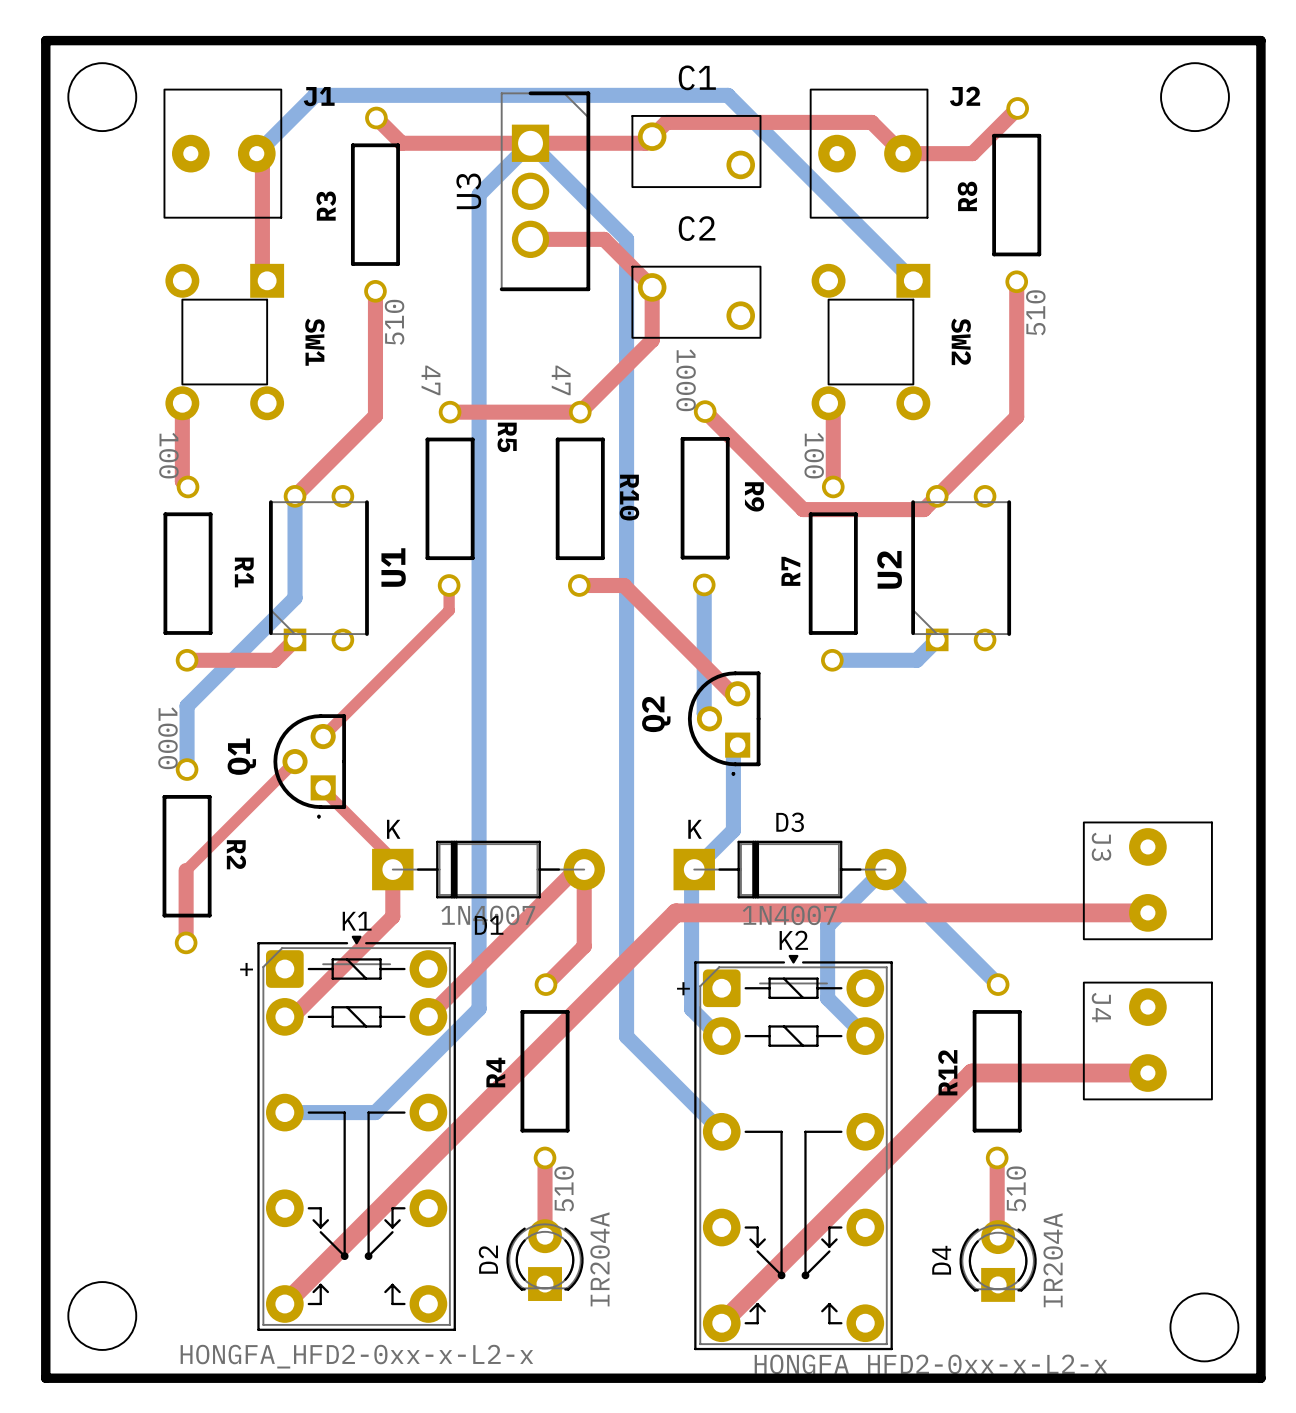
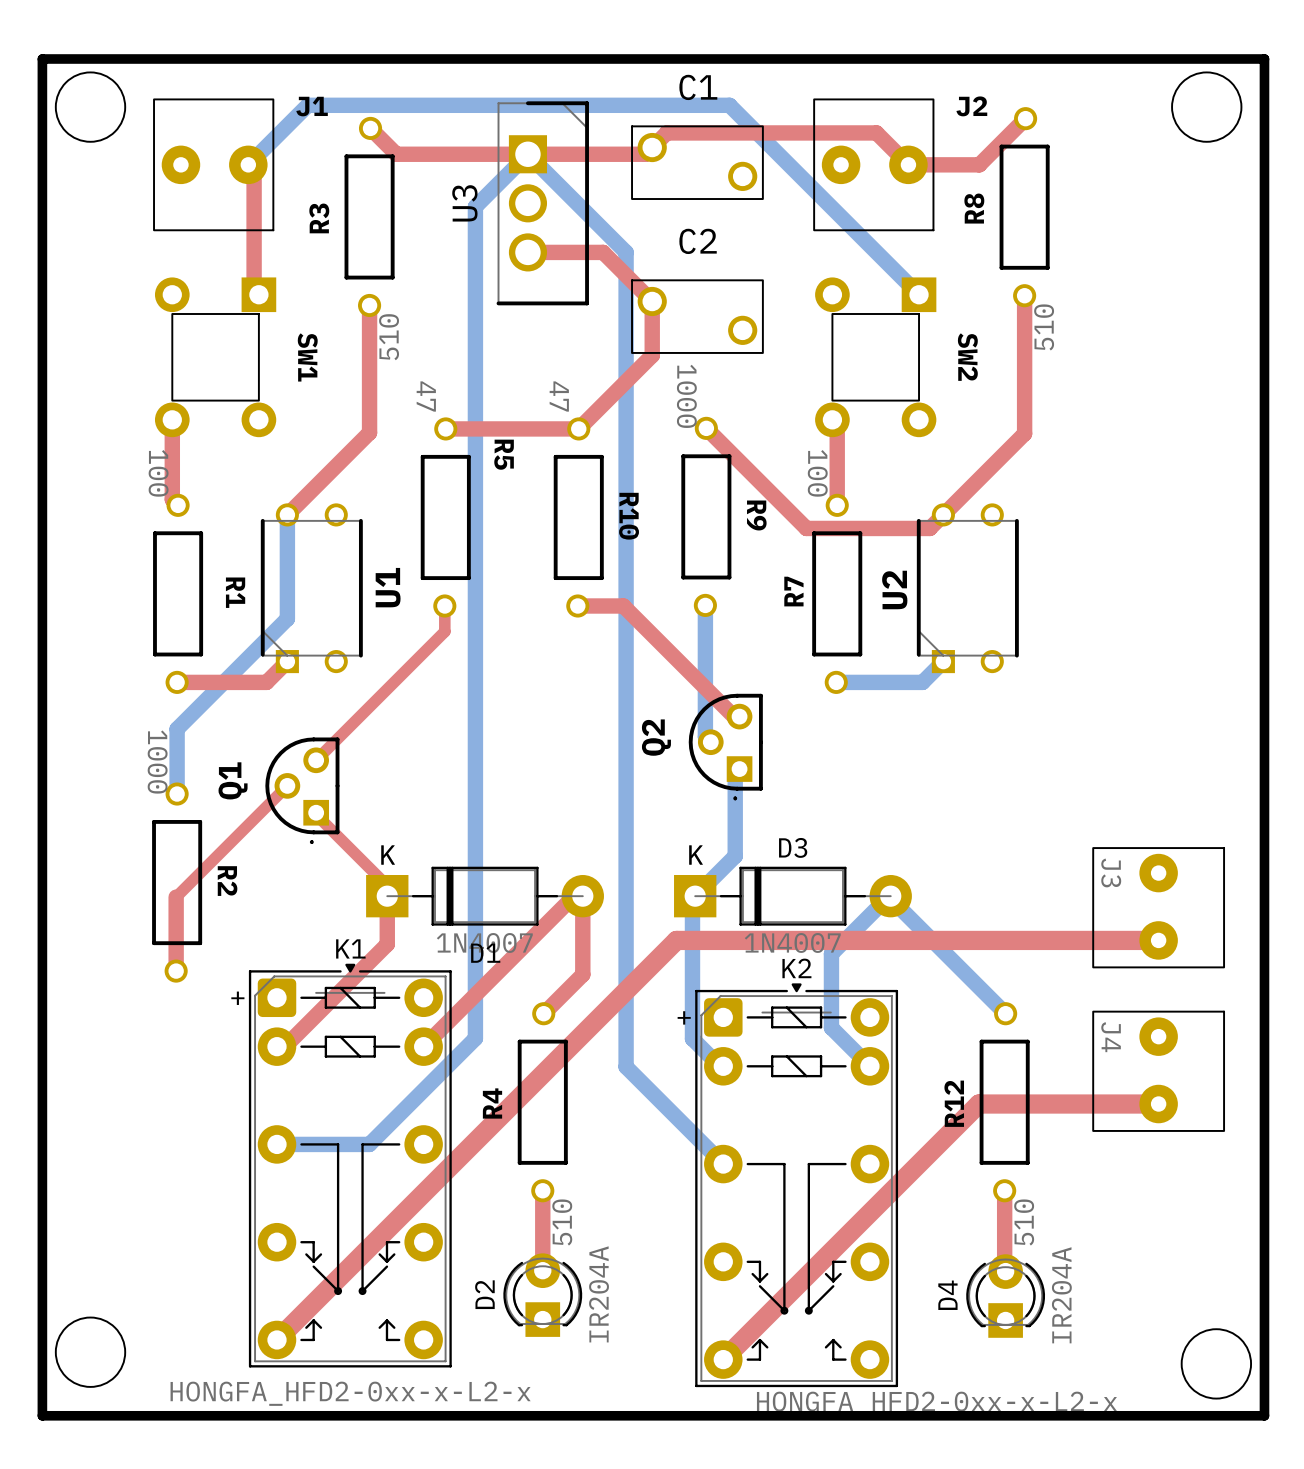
board edge: (55, 1378) (45, 1378) (45, 40) (1260, 40) (1260, 1378) (1251, 1378) -> (42, 1415) (42, 58) (1264, 58) (1264, 1415)

